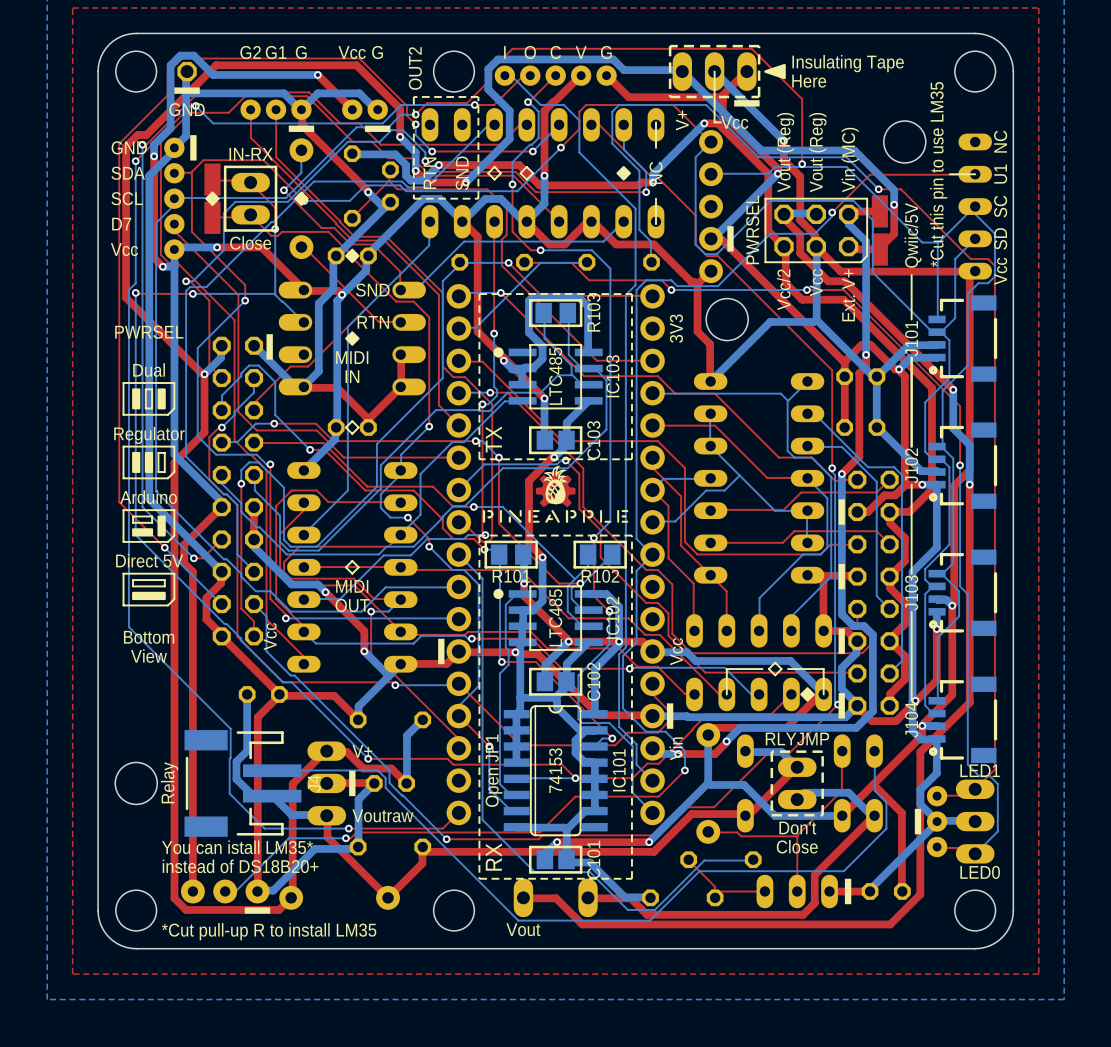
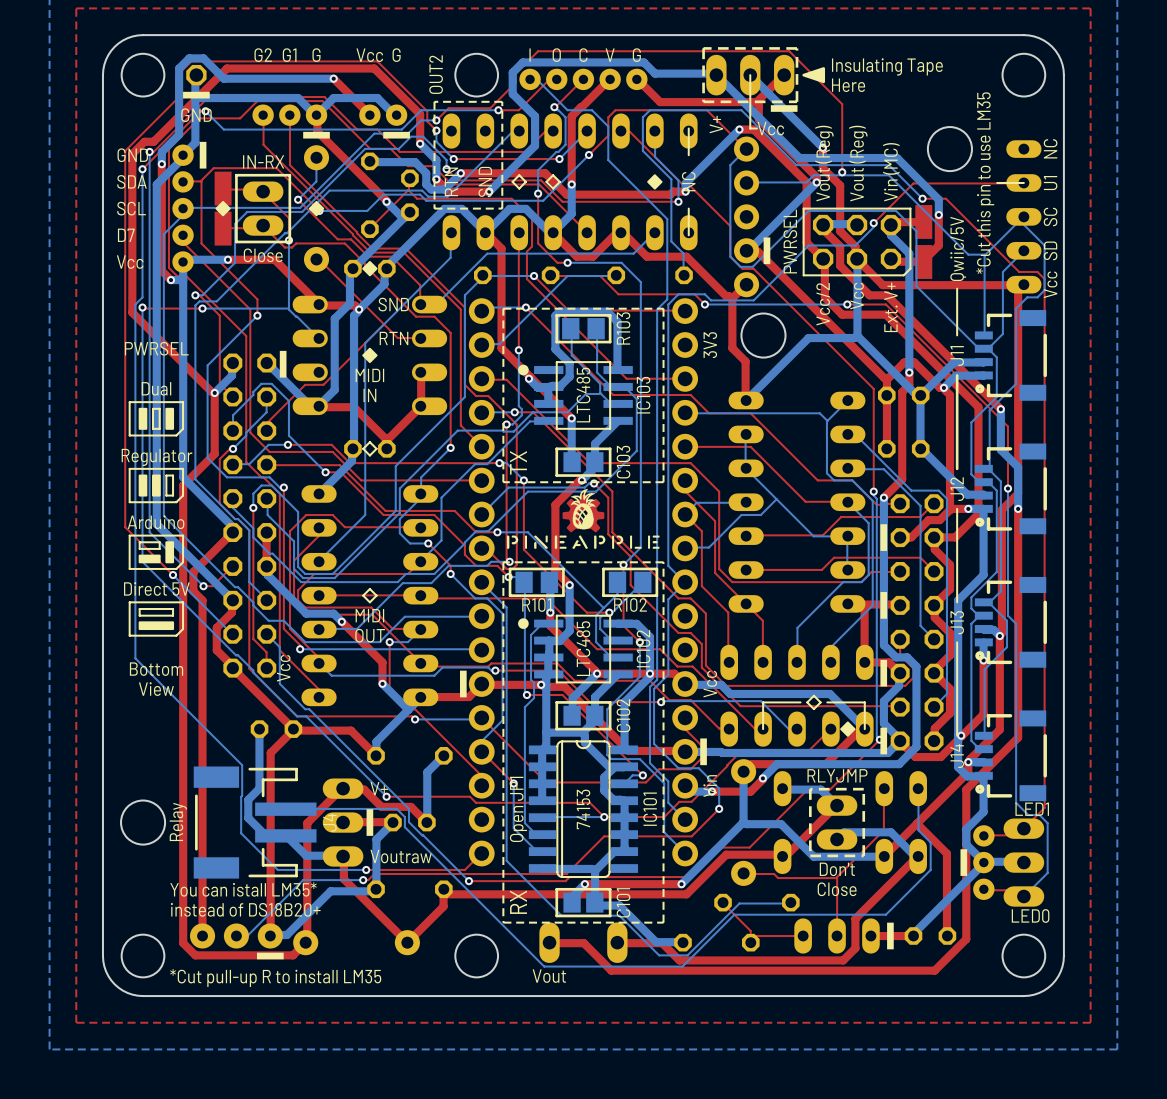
J101 name: J101 (911, 338) -> J11 (957, 355)
J102 name: J102 (911, 465) -> J12 (957, 489)
J103 name: J103 (911, 592) -> J13 (957, 622)
J104 name: J104 (911, 719) -> J14 (957, 756)

